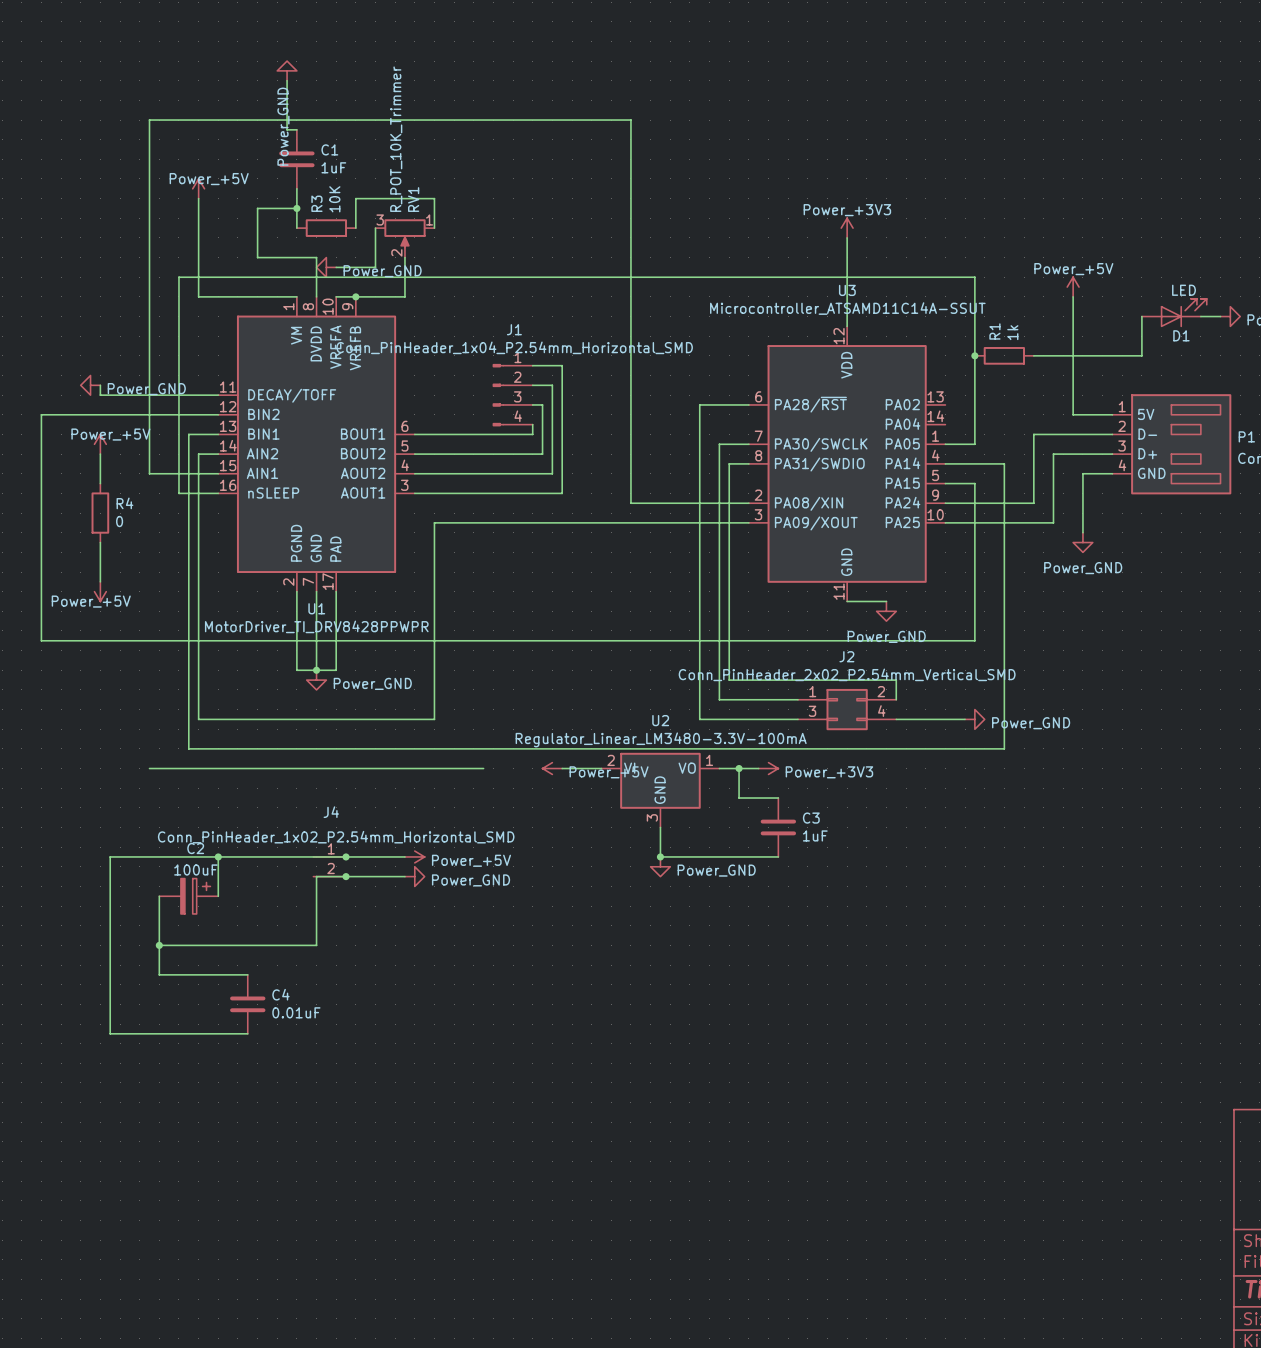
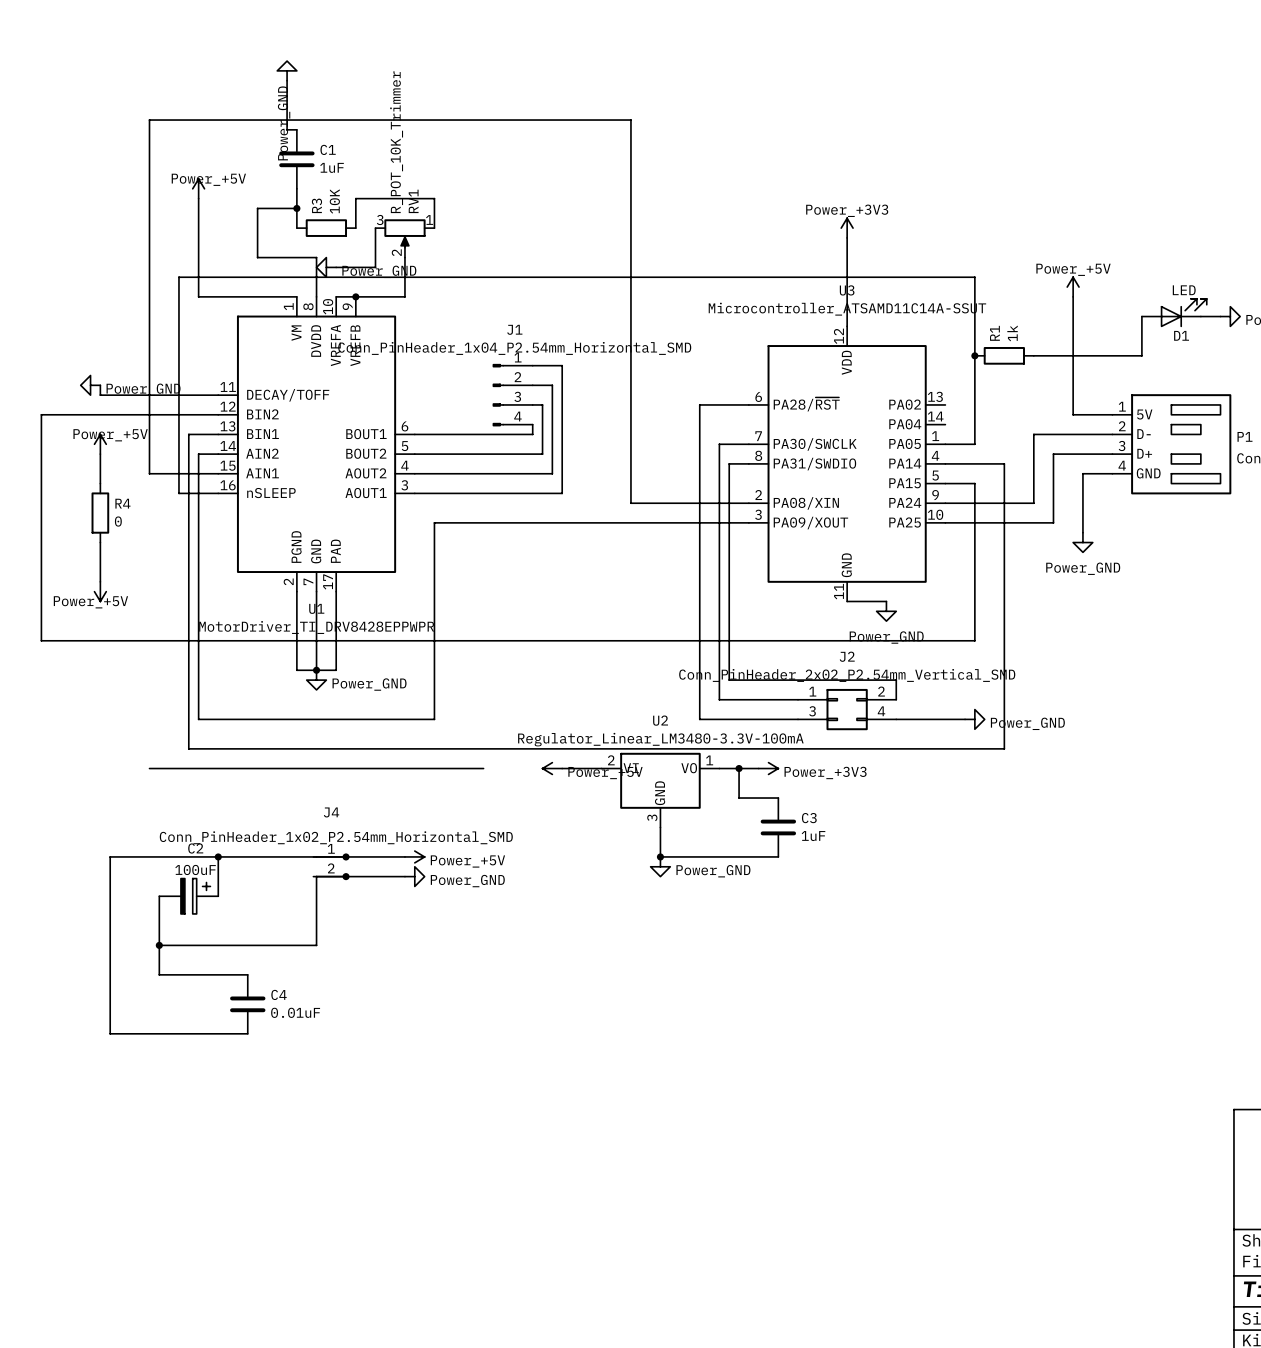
U1 value: MotorDriver_TI_DRV8428PPWPR (316, 626) -> MotorDriver_TI_DRV8428EPPWPR (316, 627)

